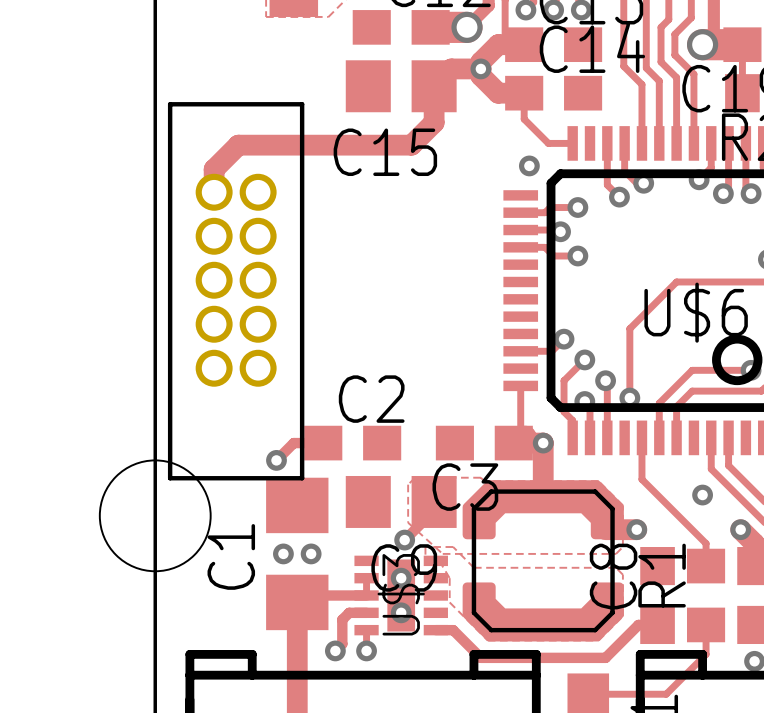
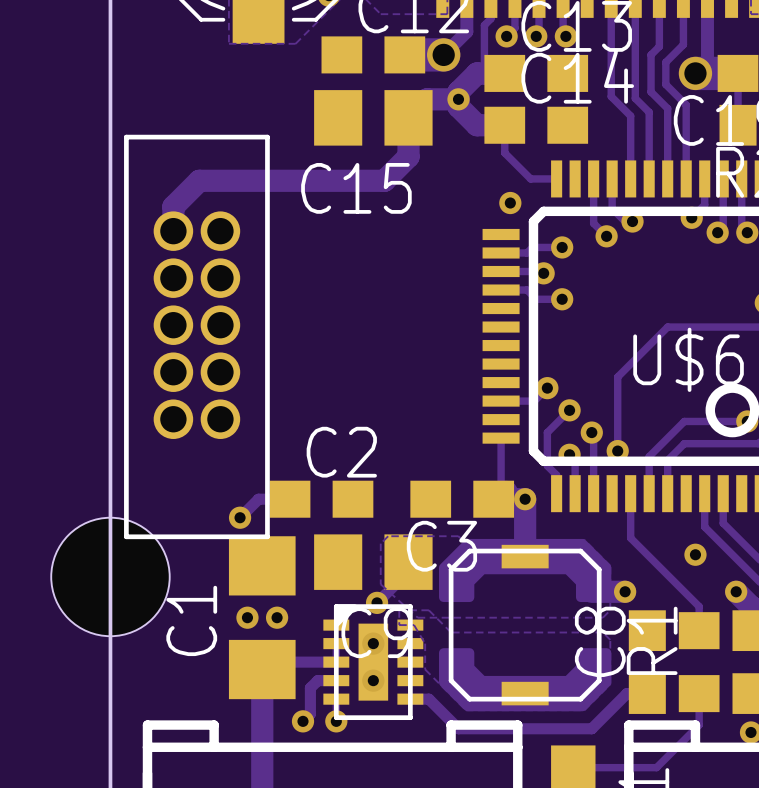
U$3: (401, 595) -> none
part: none -> (373, 662)

